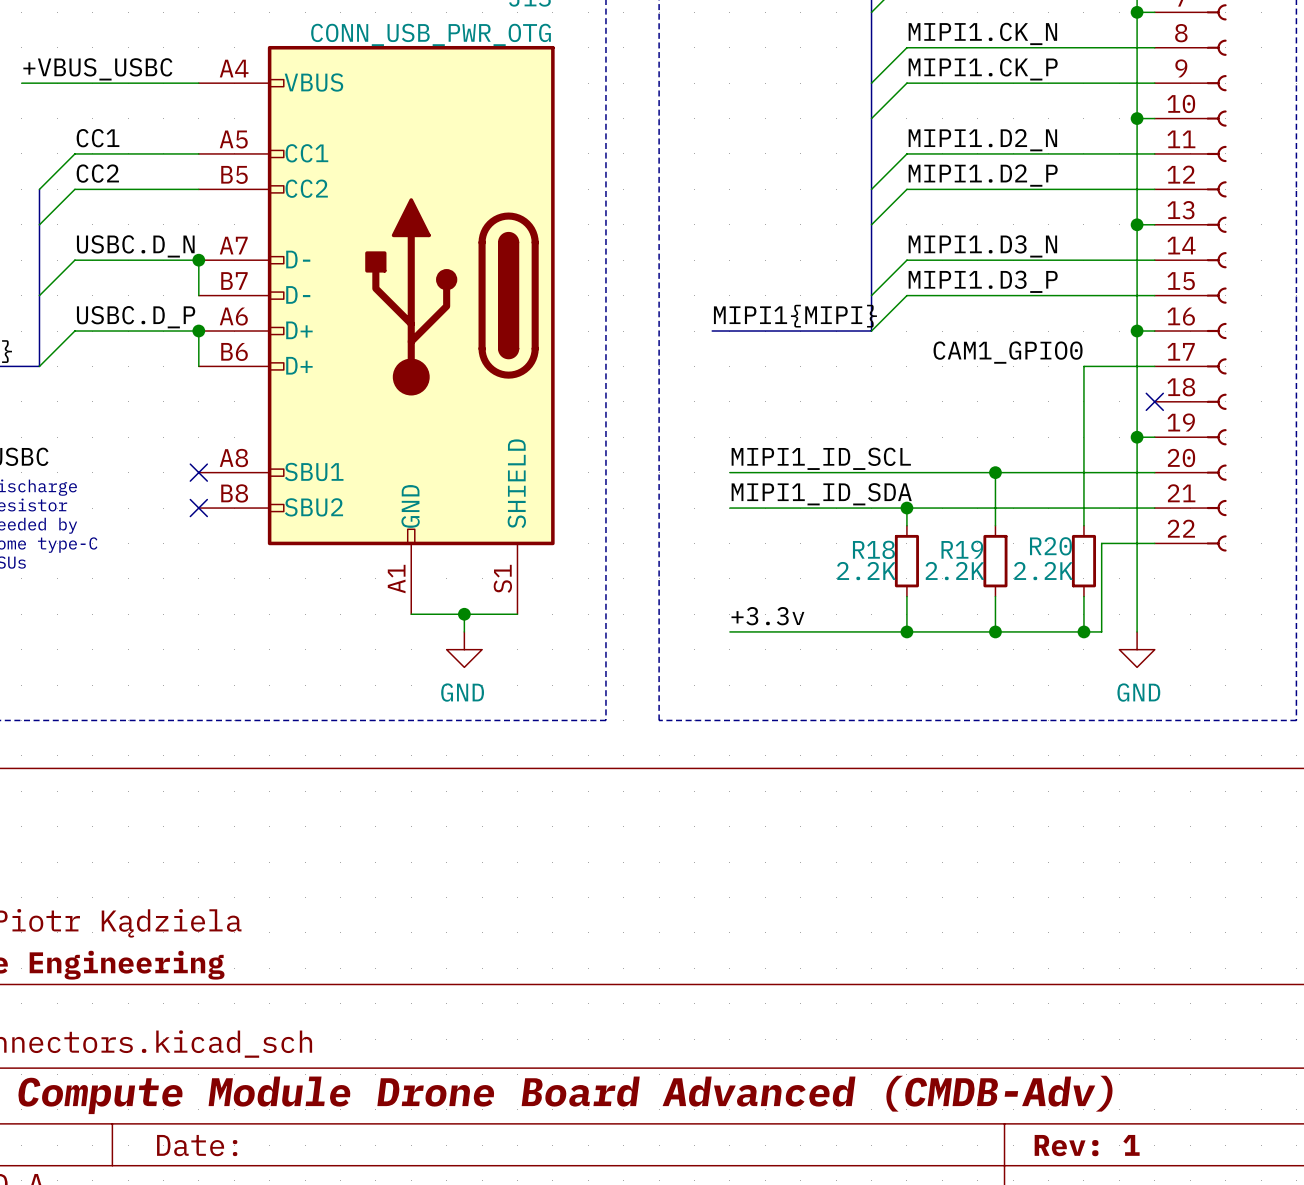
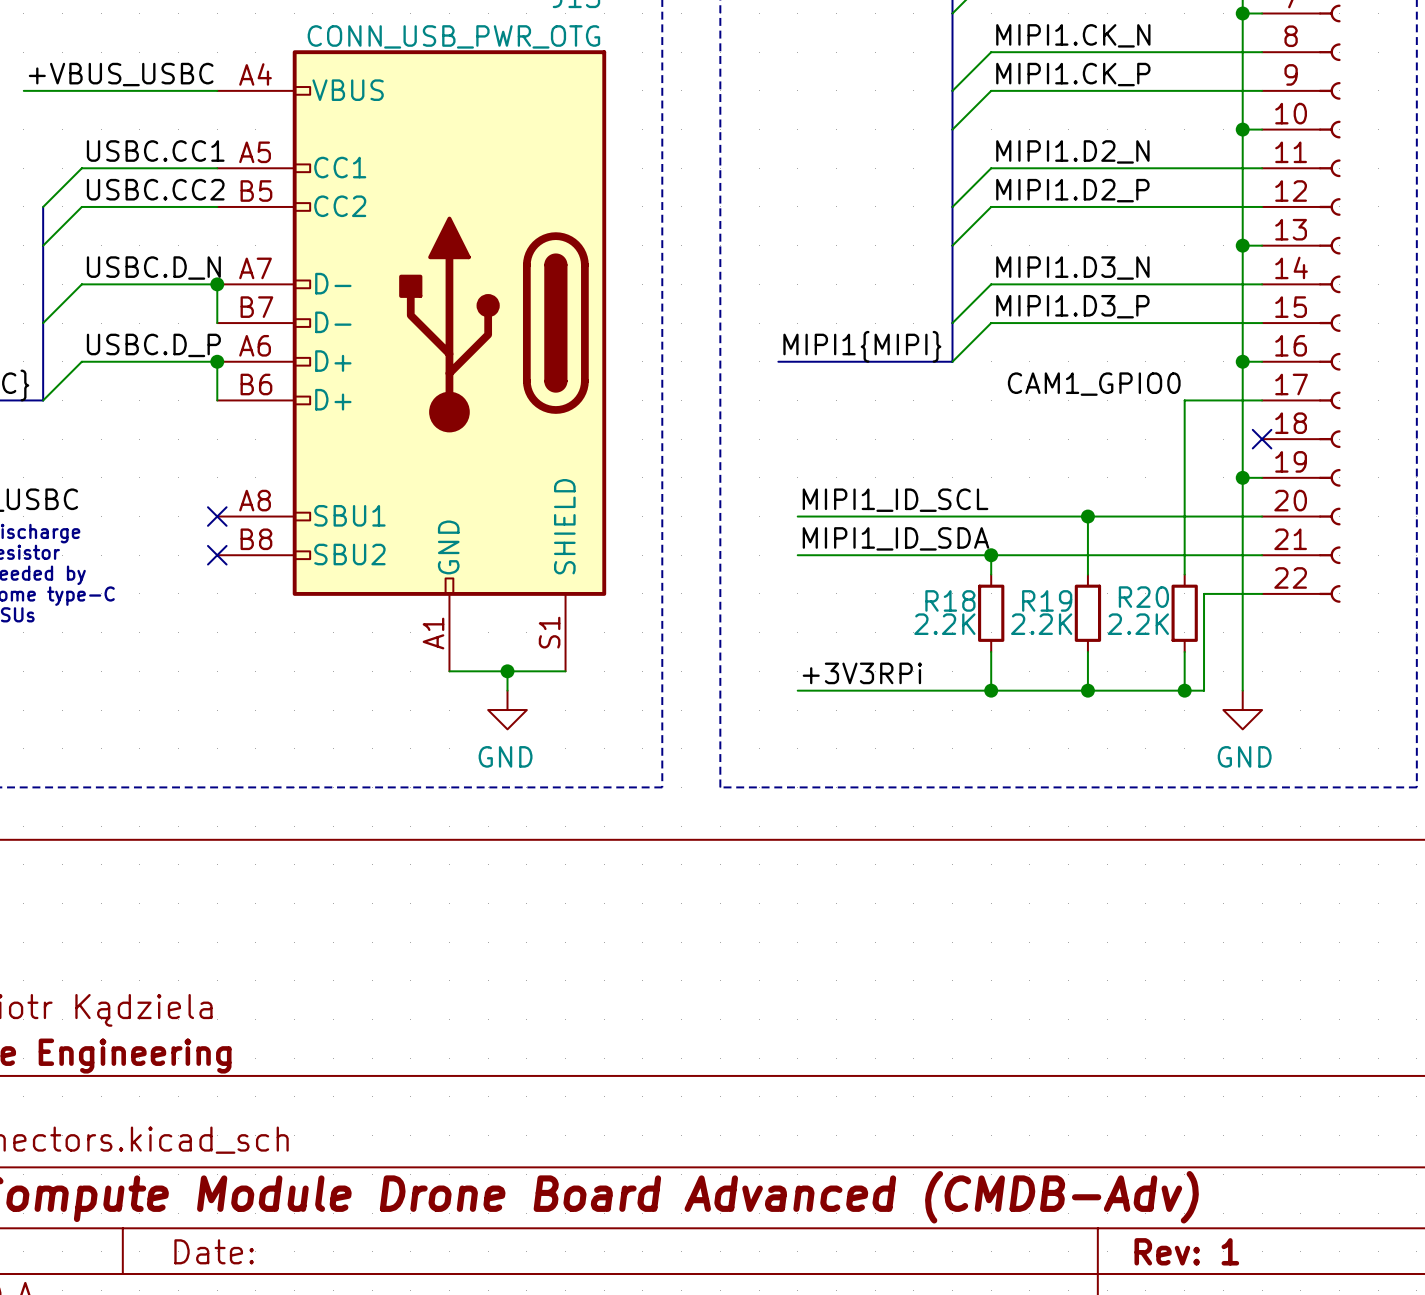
label: CC1 (98, 138) -> USBC.CC1 (155, 151)
label: CC2 (97, 173) -> USBC.CC2 (155, 189)
label: +3.3v (767, 616) -> +3V3RPi (862, 673)

